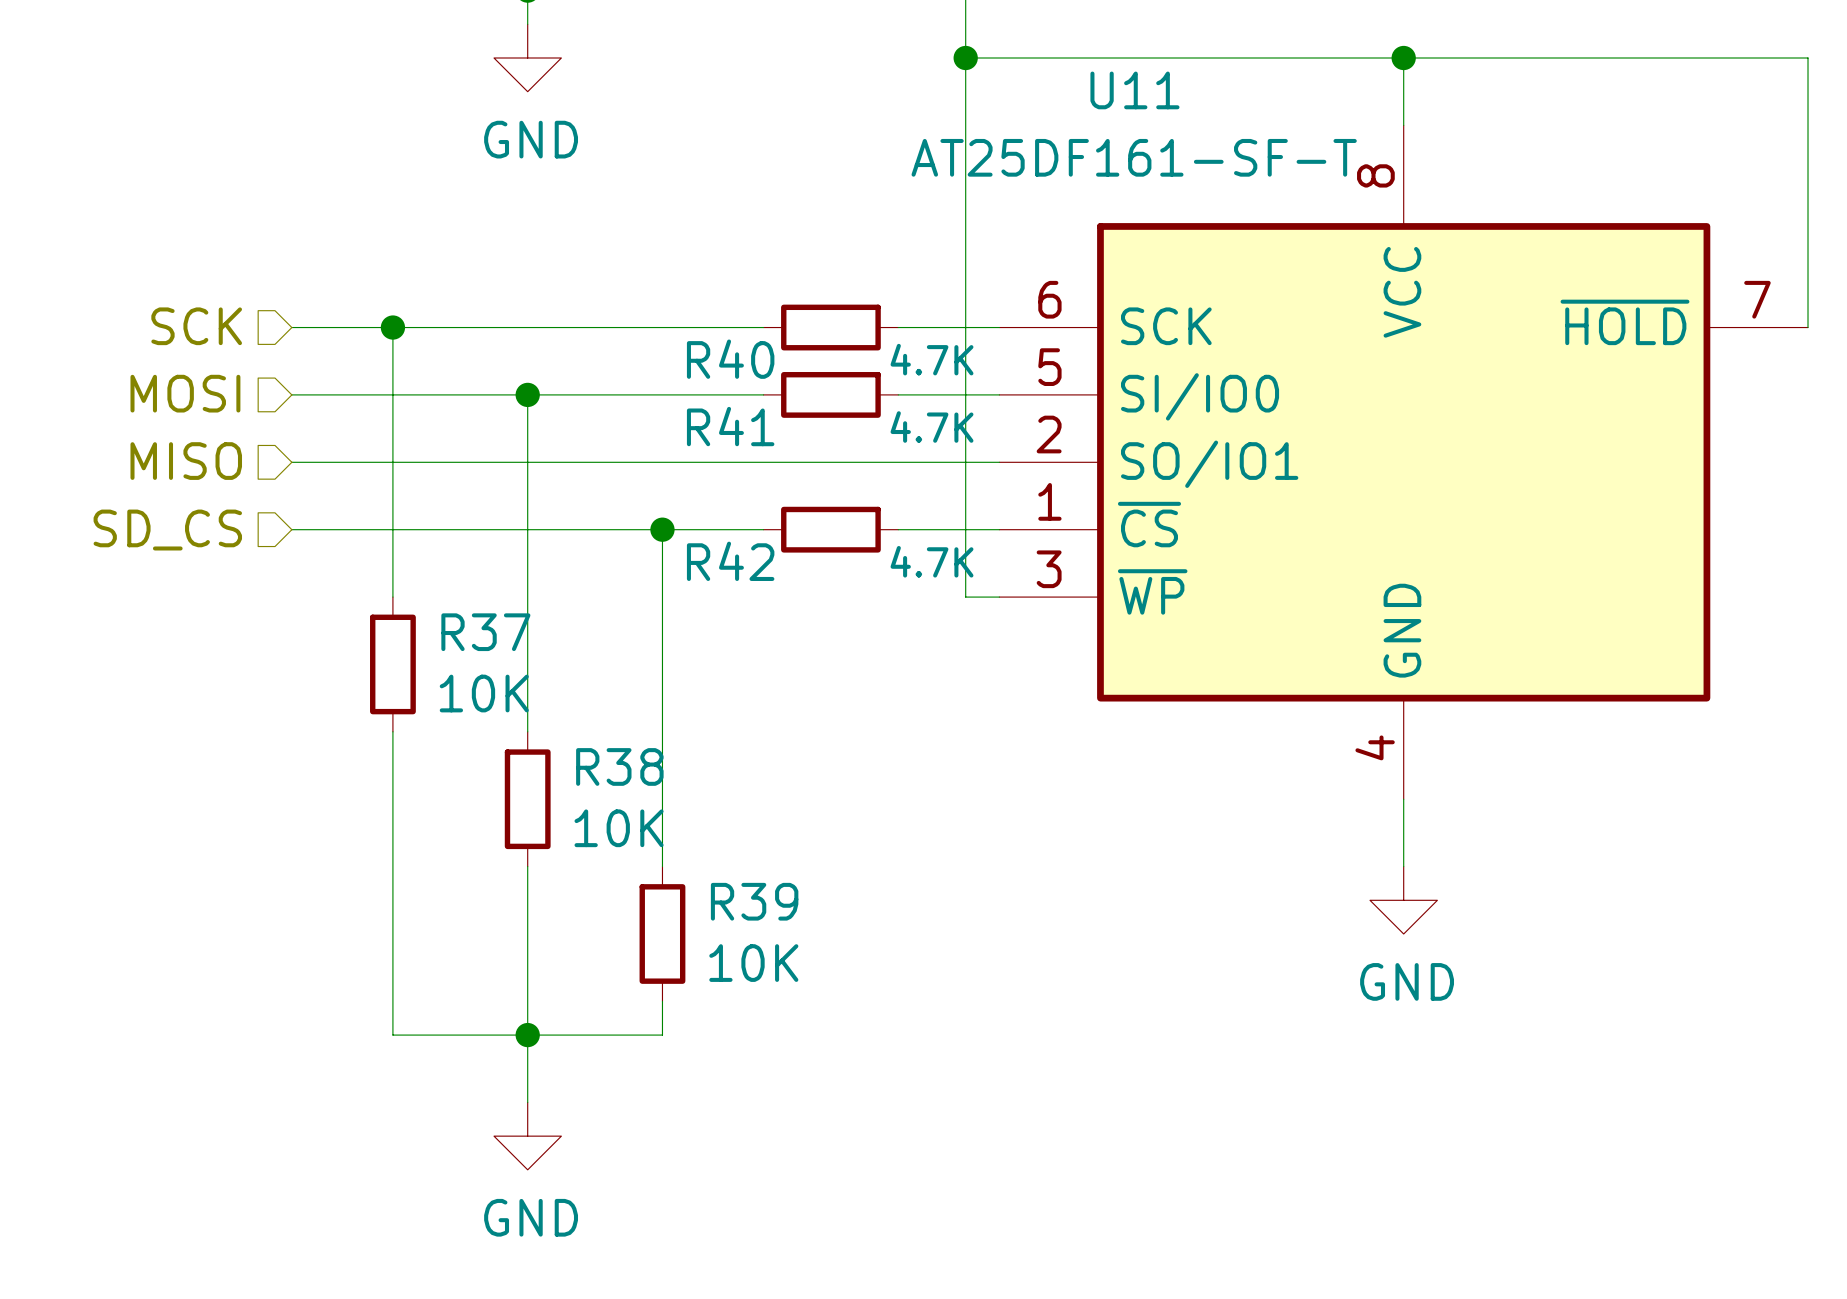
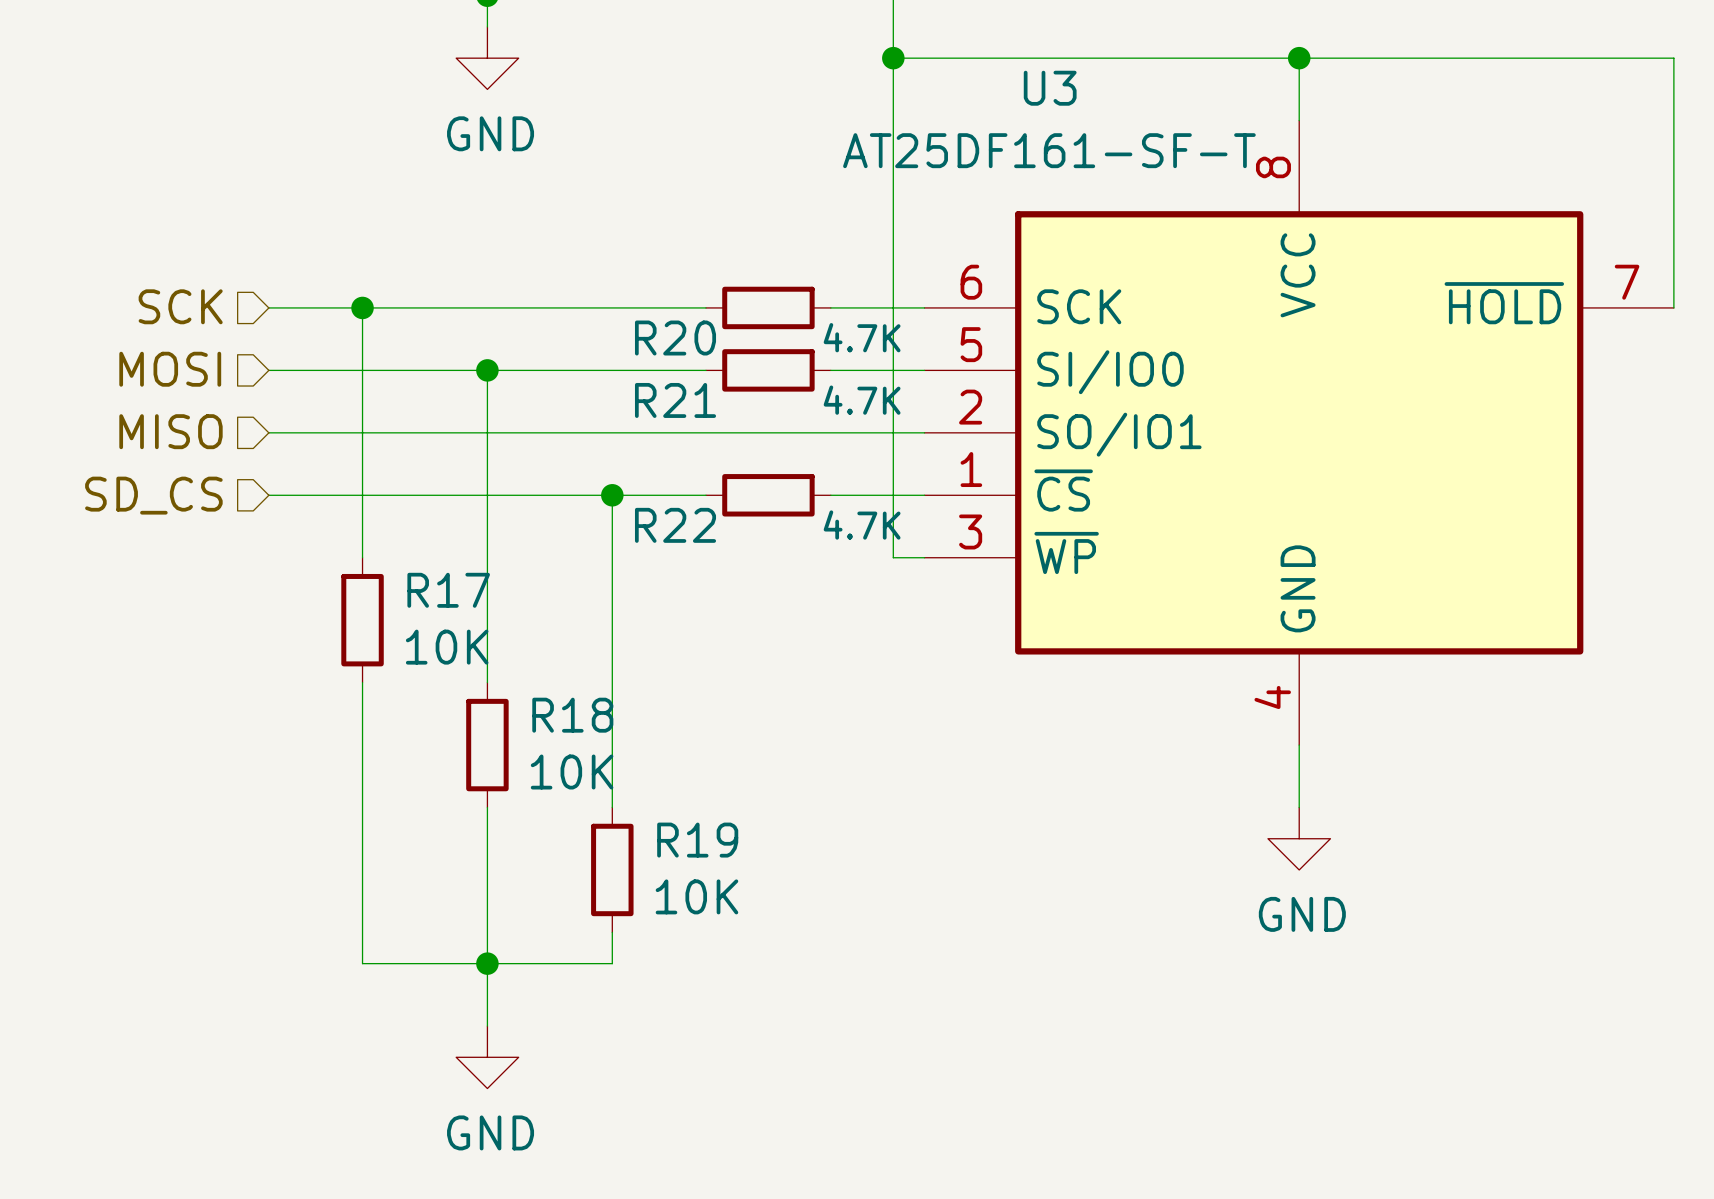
U11 name: U11 (1134, 90) -> U3 (1050, 88)
R40 name: R40 (730, 359) -> R20 (675, 338)
R41 name: R41 (730, 426) -> R21 (675, 400)
R42 name: R42 (730, 561) -> R22 (675, 525)
R37 name: R37 (485, 632) -> R17 (448, 590)
R38 name: R38 (619, 766) -> R18 (572, 715)
R39 name: R39 (754, 901) -> R19 (697, 840)

